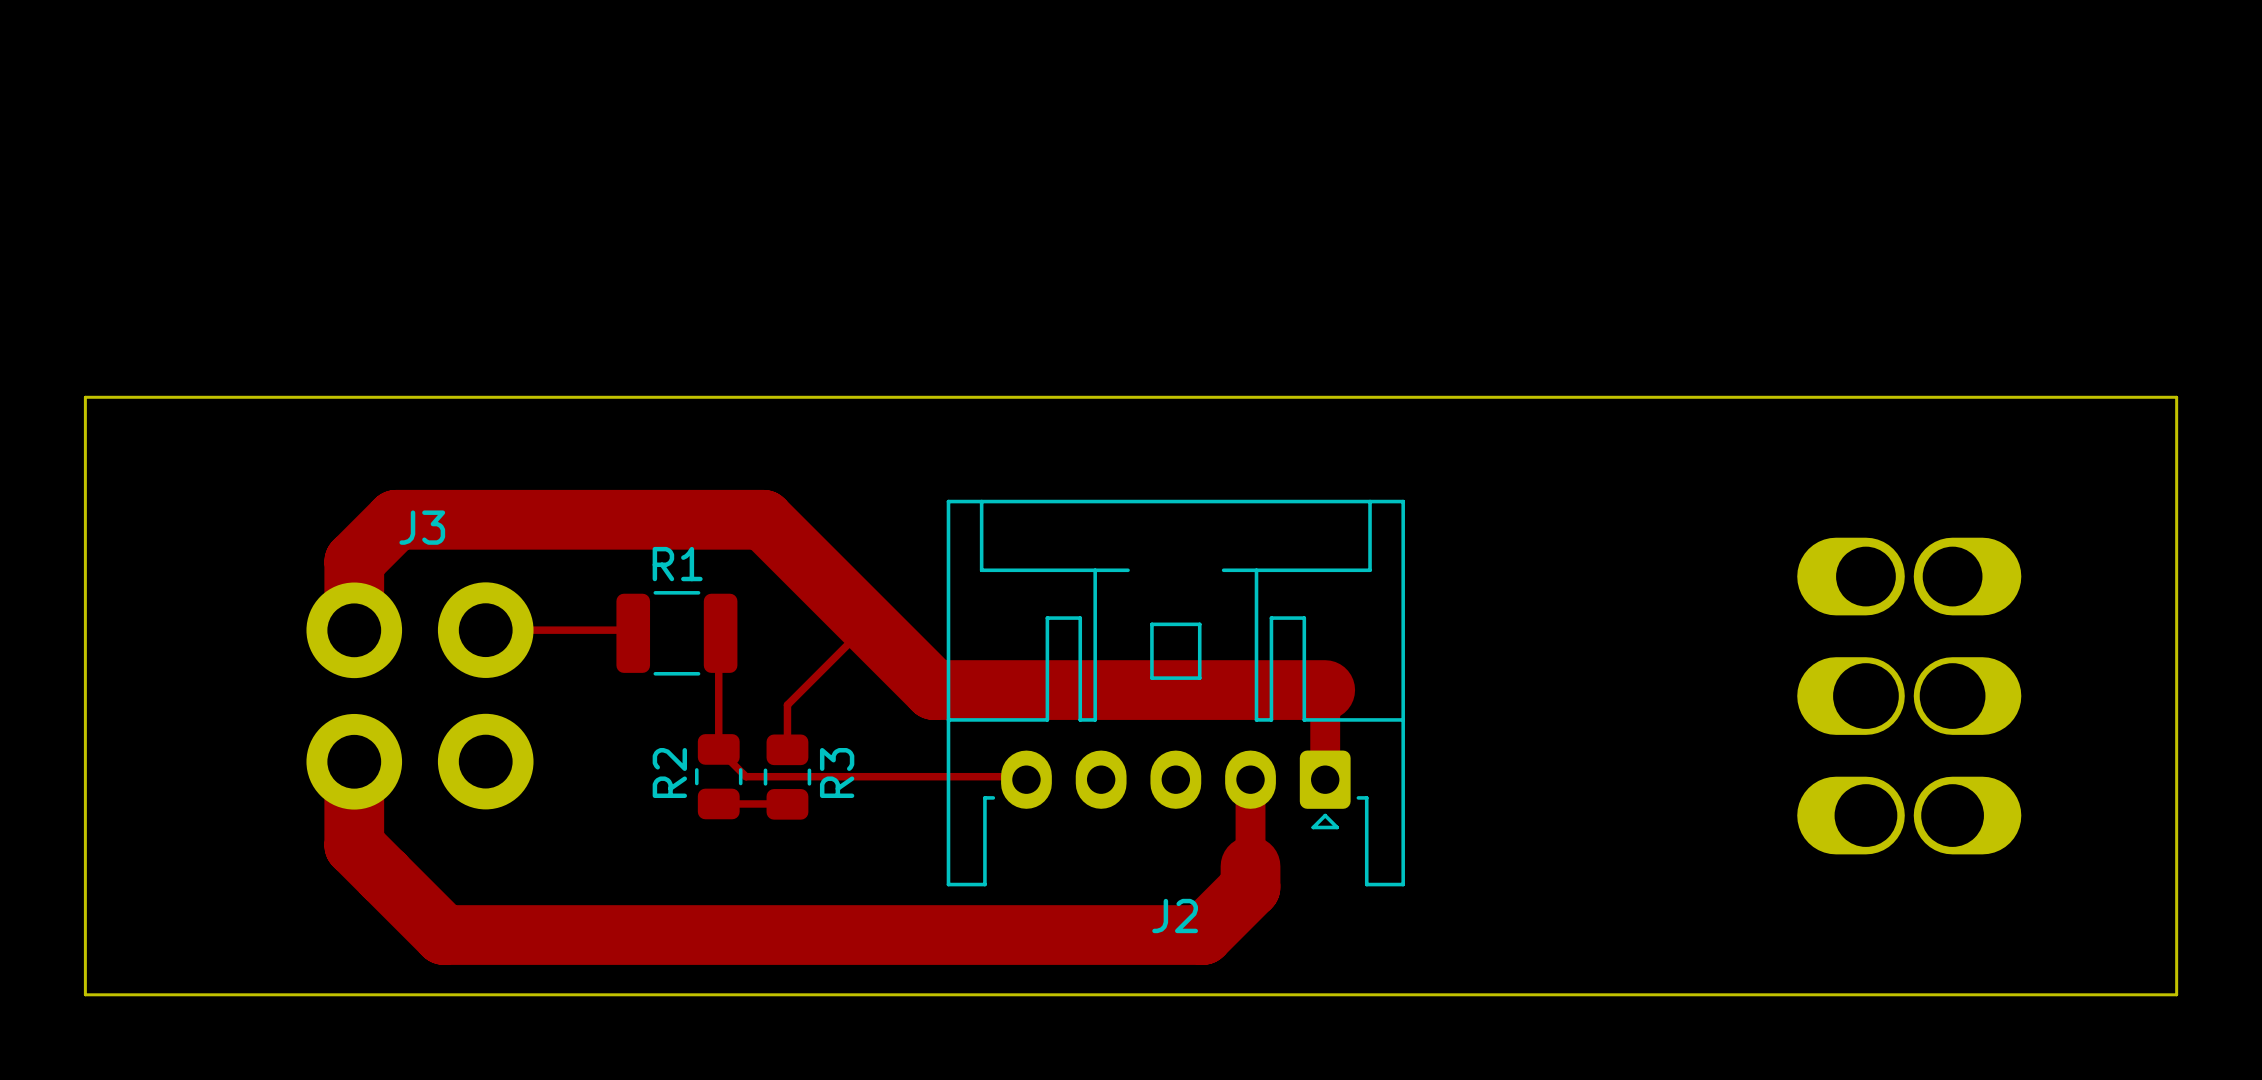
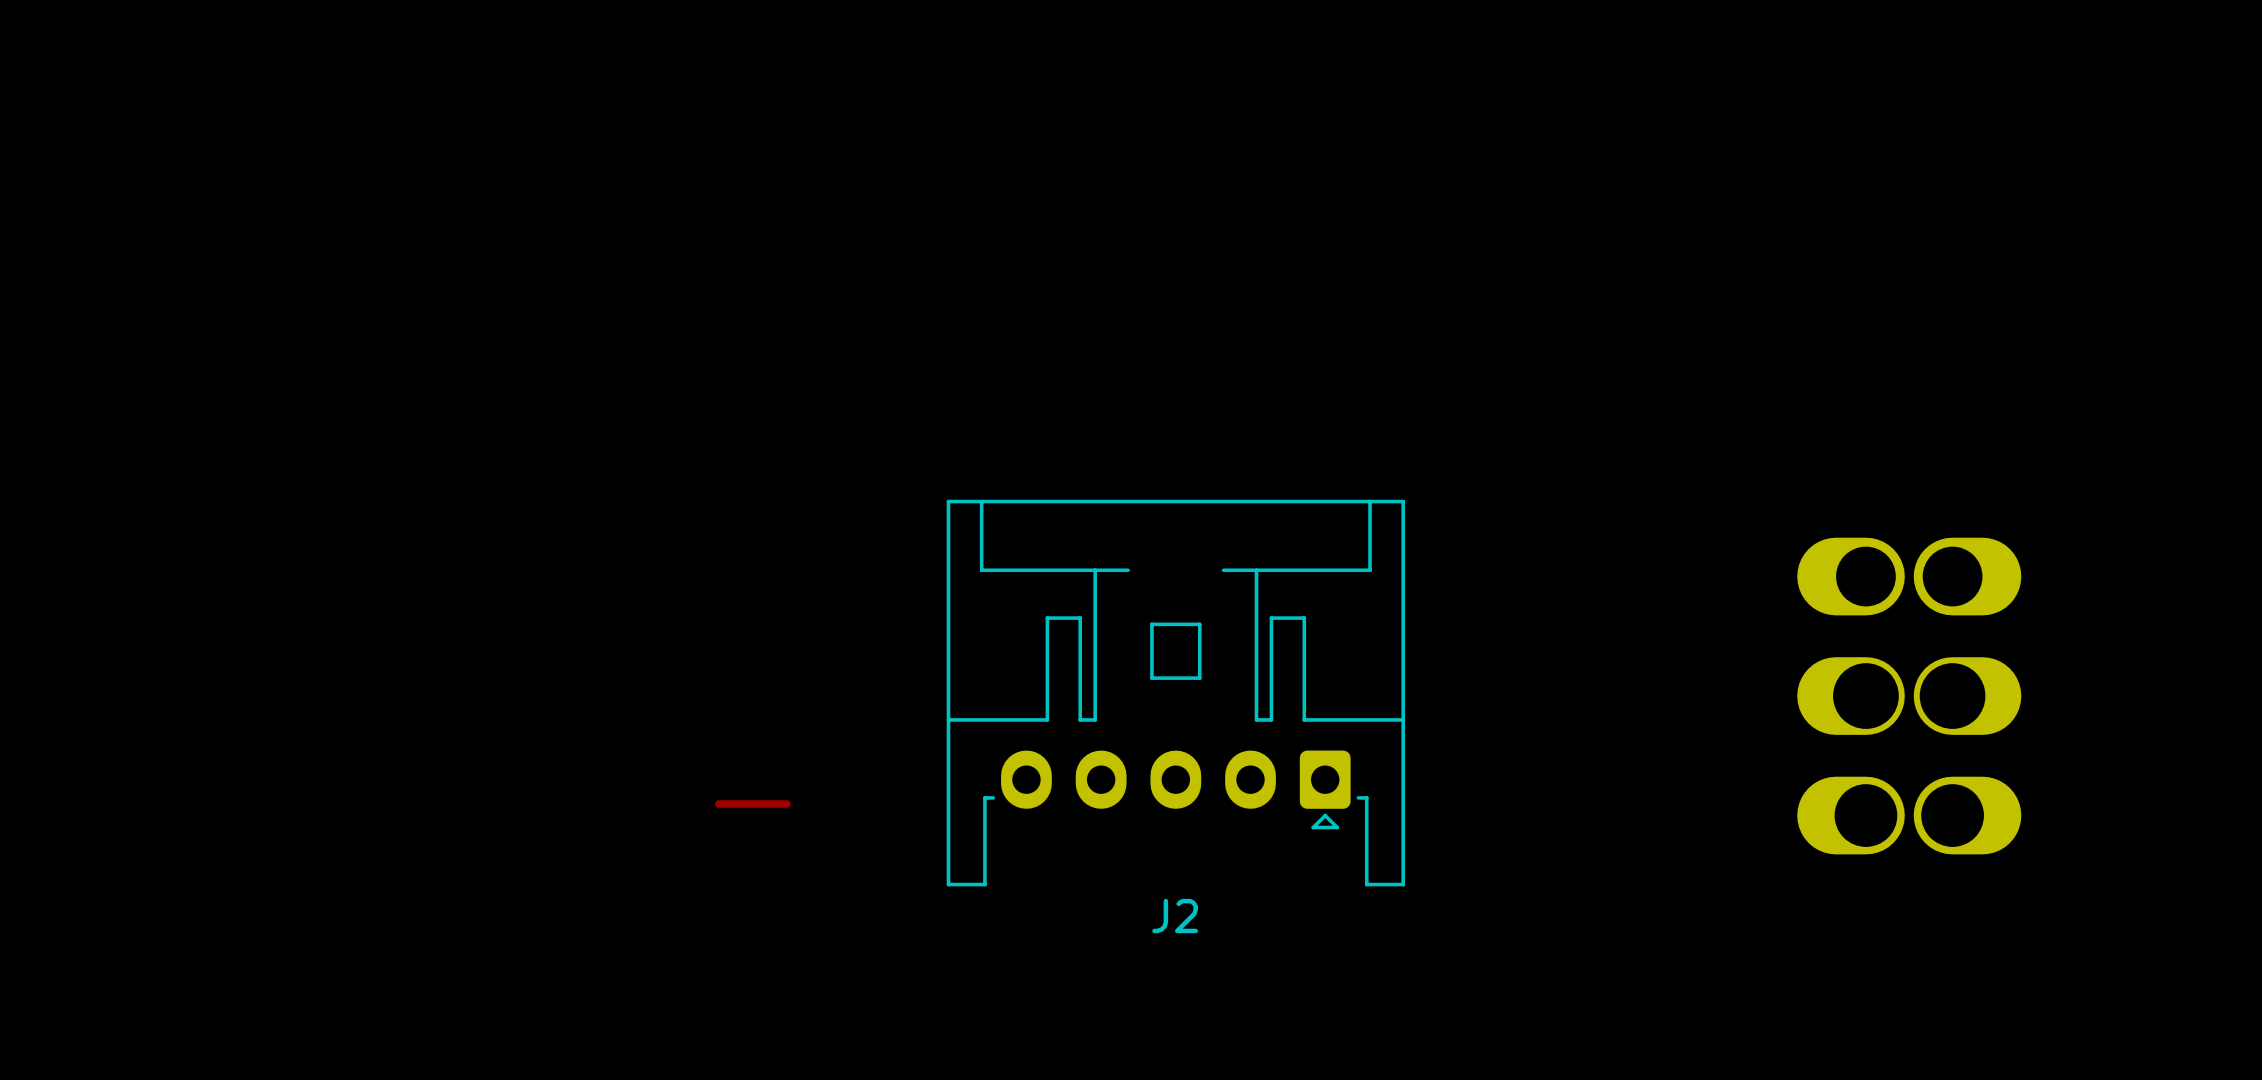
board edge: (85, 397) (2176, 397) (2176, 994) (85, 994) (85, 397) -> none
track: (354, 630) (354, 561) (396, 519) (763, 519) (933, 690) (1325, 690) (1325, 779) -> none
track: (485, 630) (630, 630) (633, 633) -> none
R1: (676, 633) -> none
track: (720, 633) (718, 635) (718, 749) (746, 776) (1023, 776) (1026, 779) -> none
track: (859, 633) (787, 705) (787, 749) -> none
J3: (420, 695) -> none
track: (354, 761) (354, 845) (443, 935) (1202, 935) (1250, 887) (1250, 779) -> none
R2: (718, 776) -> none
R3: (787, 777) -> none

